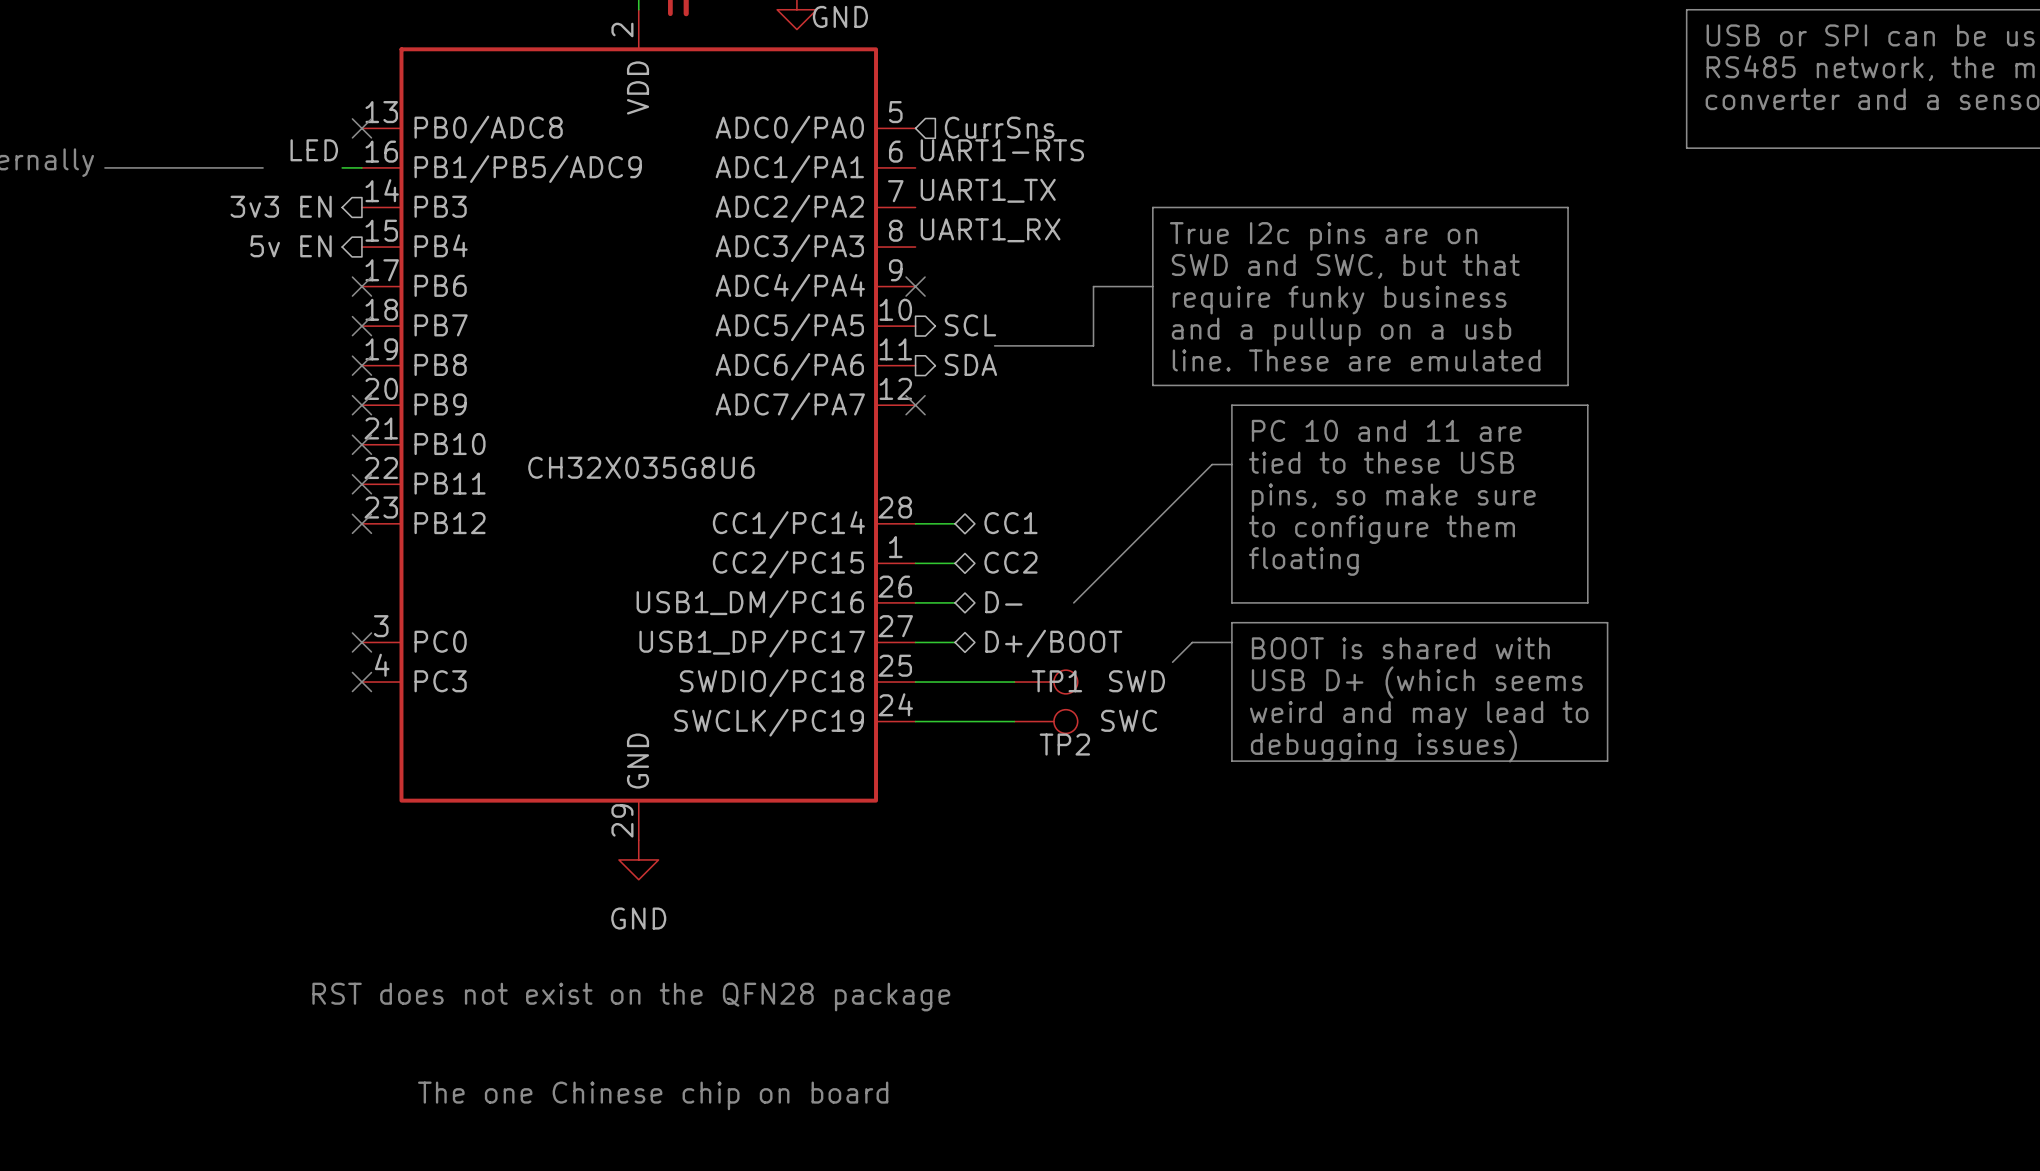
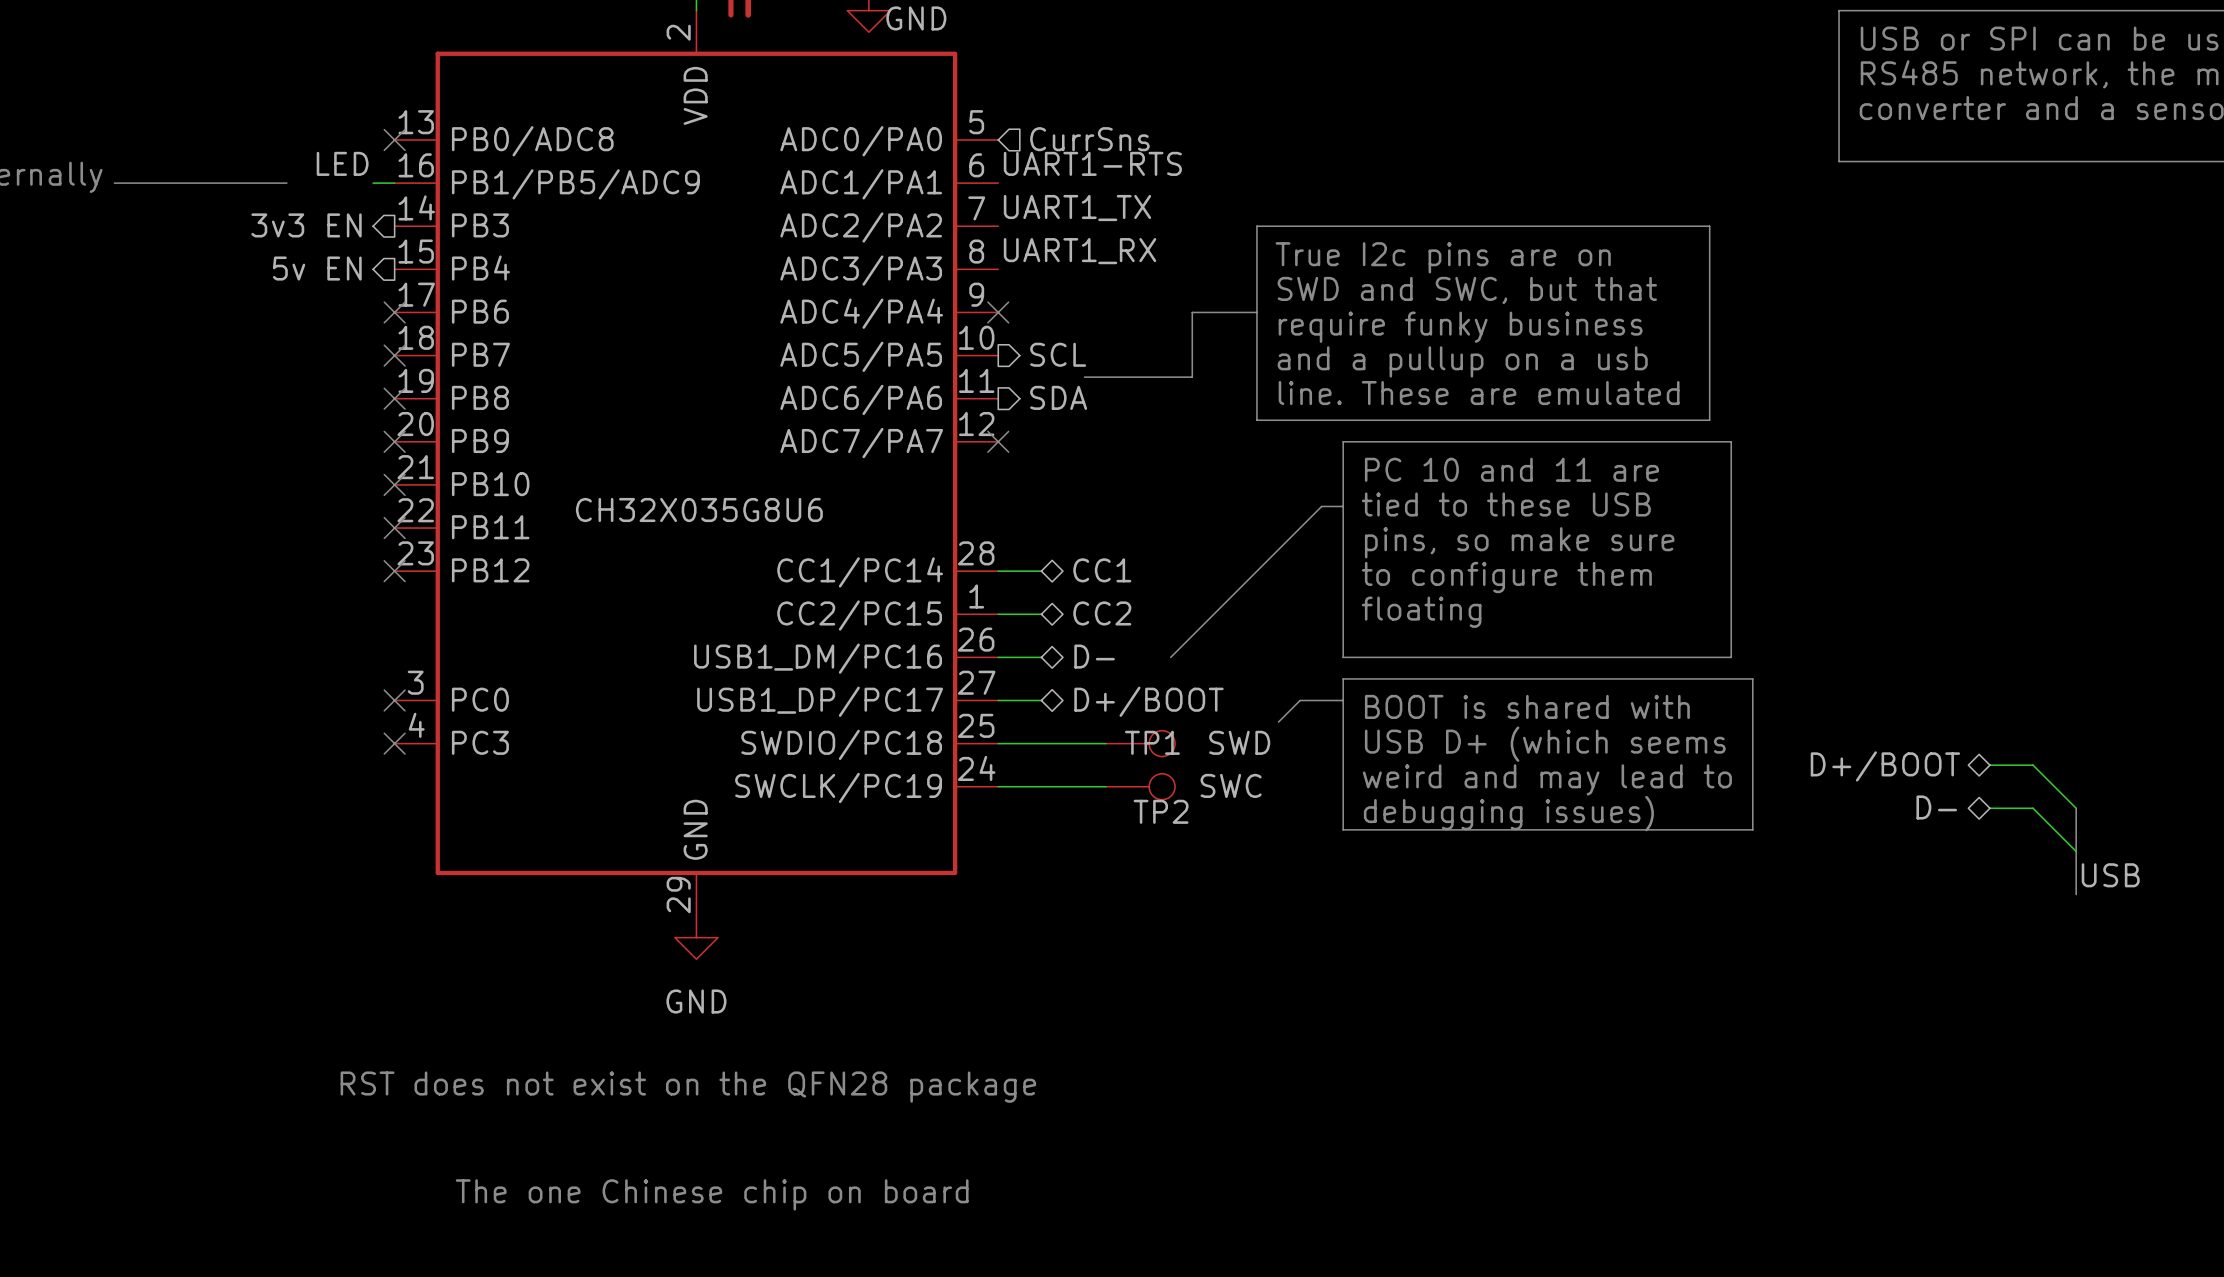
wire: none -> (1989, 765) (2033, 765) (2076, 808)
hierarchical label: none -> D+/BOOT (1885, 766)
hierarchical label: none -> D- (1936, 807)
wire: none -> (1989, 808) (2033, 808) (2076, 851)
bus: none -> (2076, 808) (2076, 894)
label: none -> USB (2110, 875)

